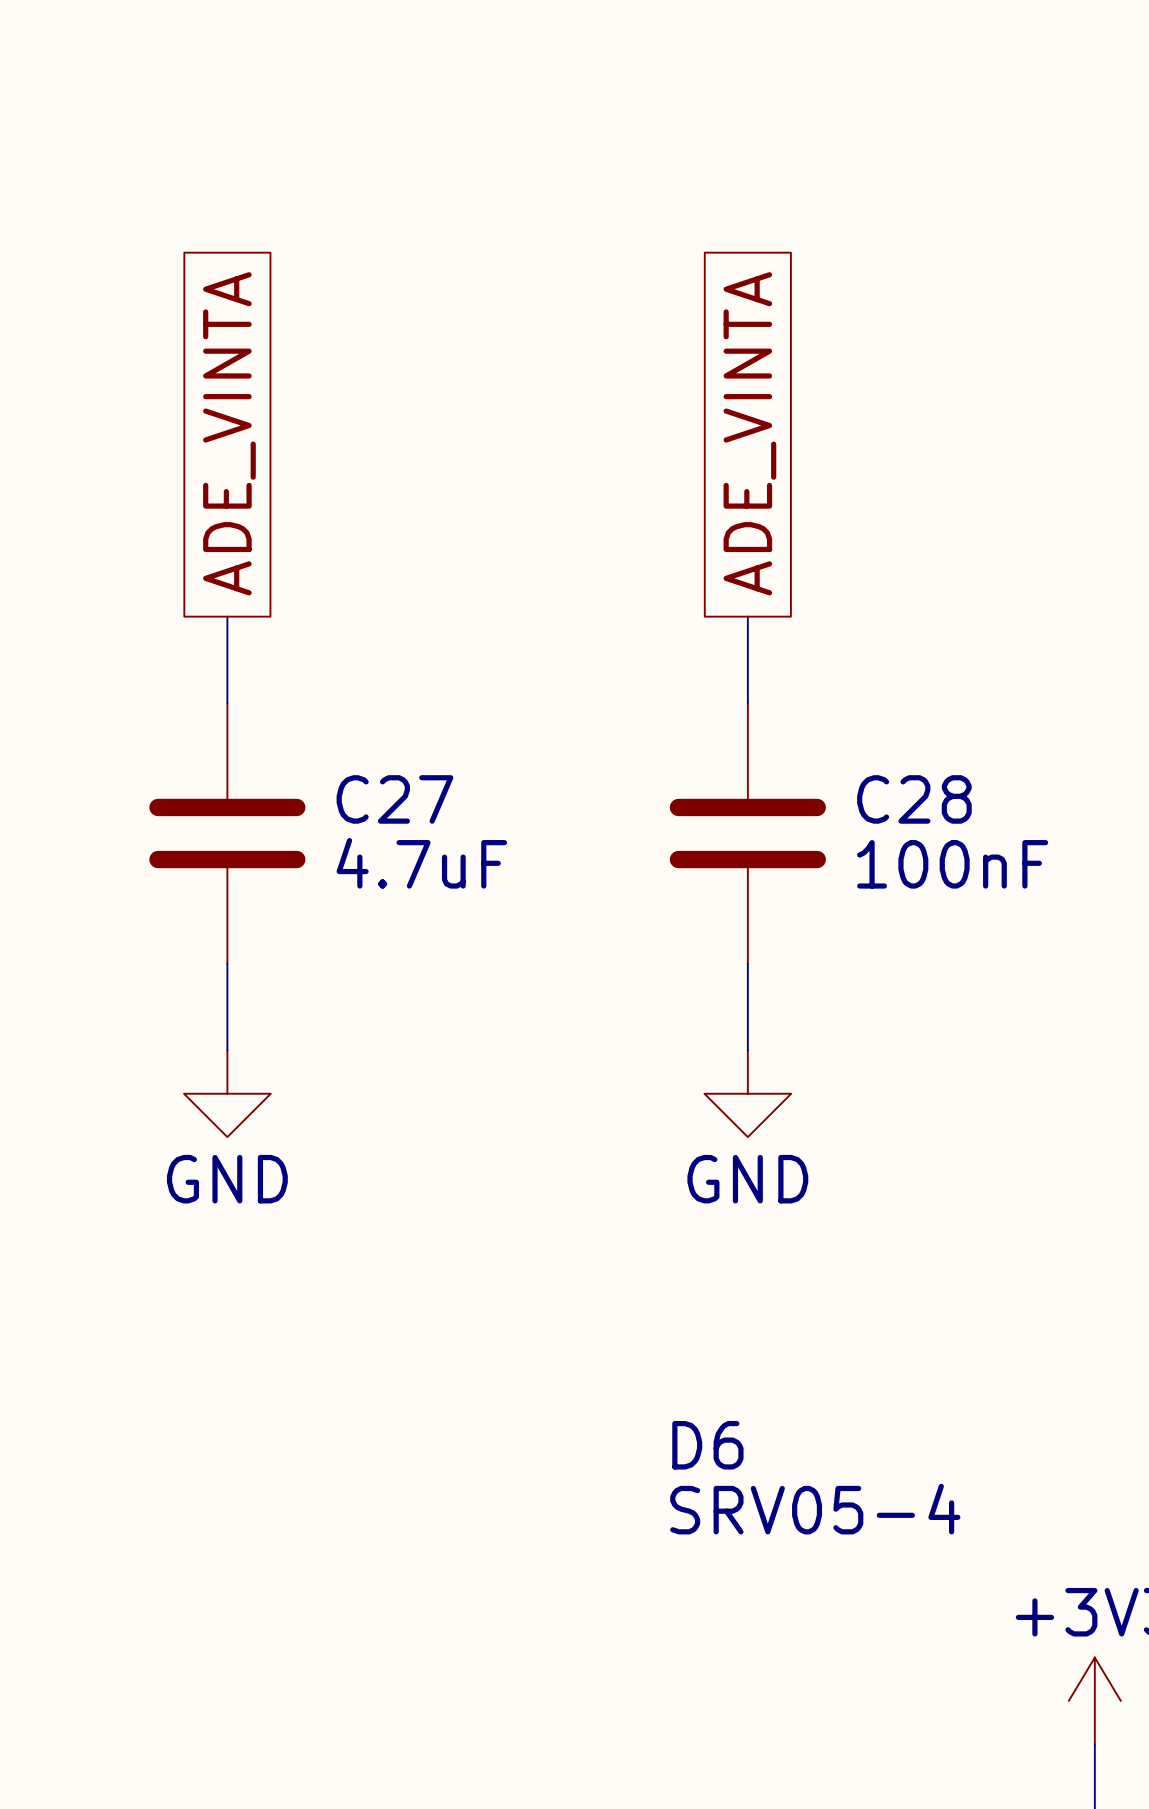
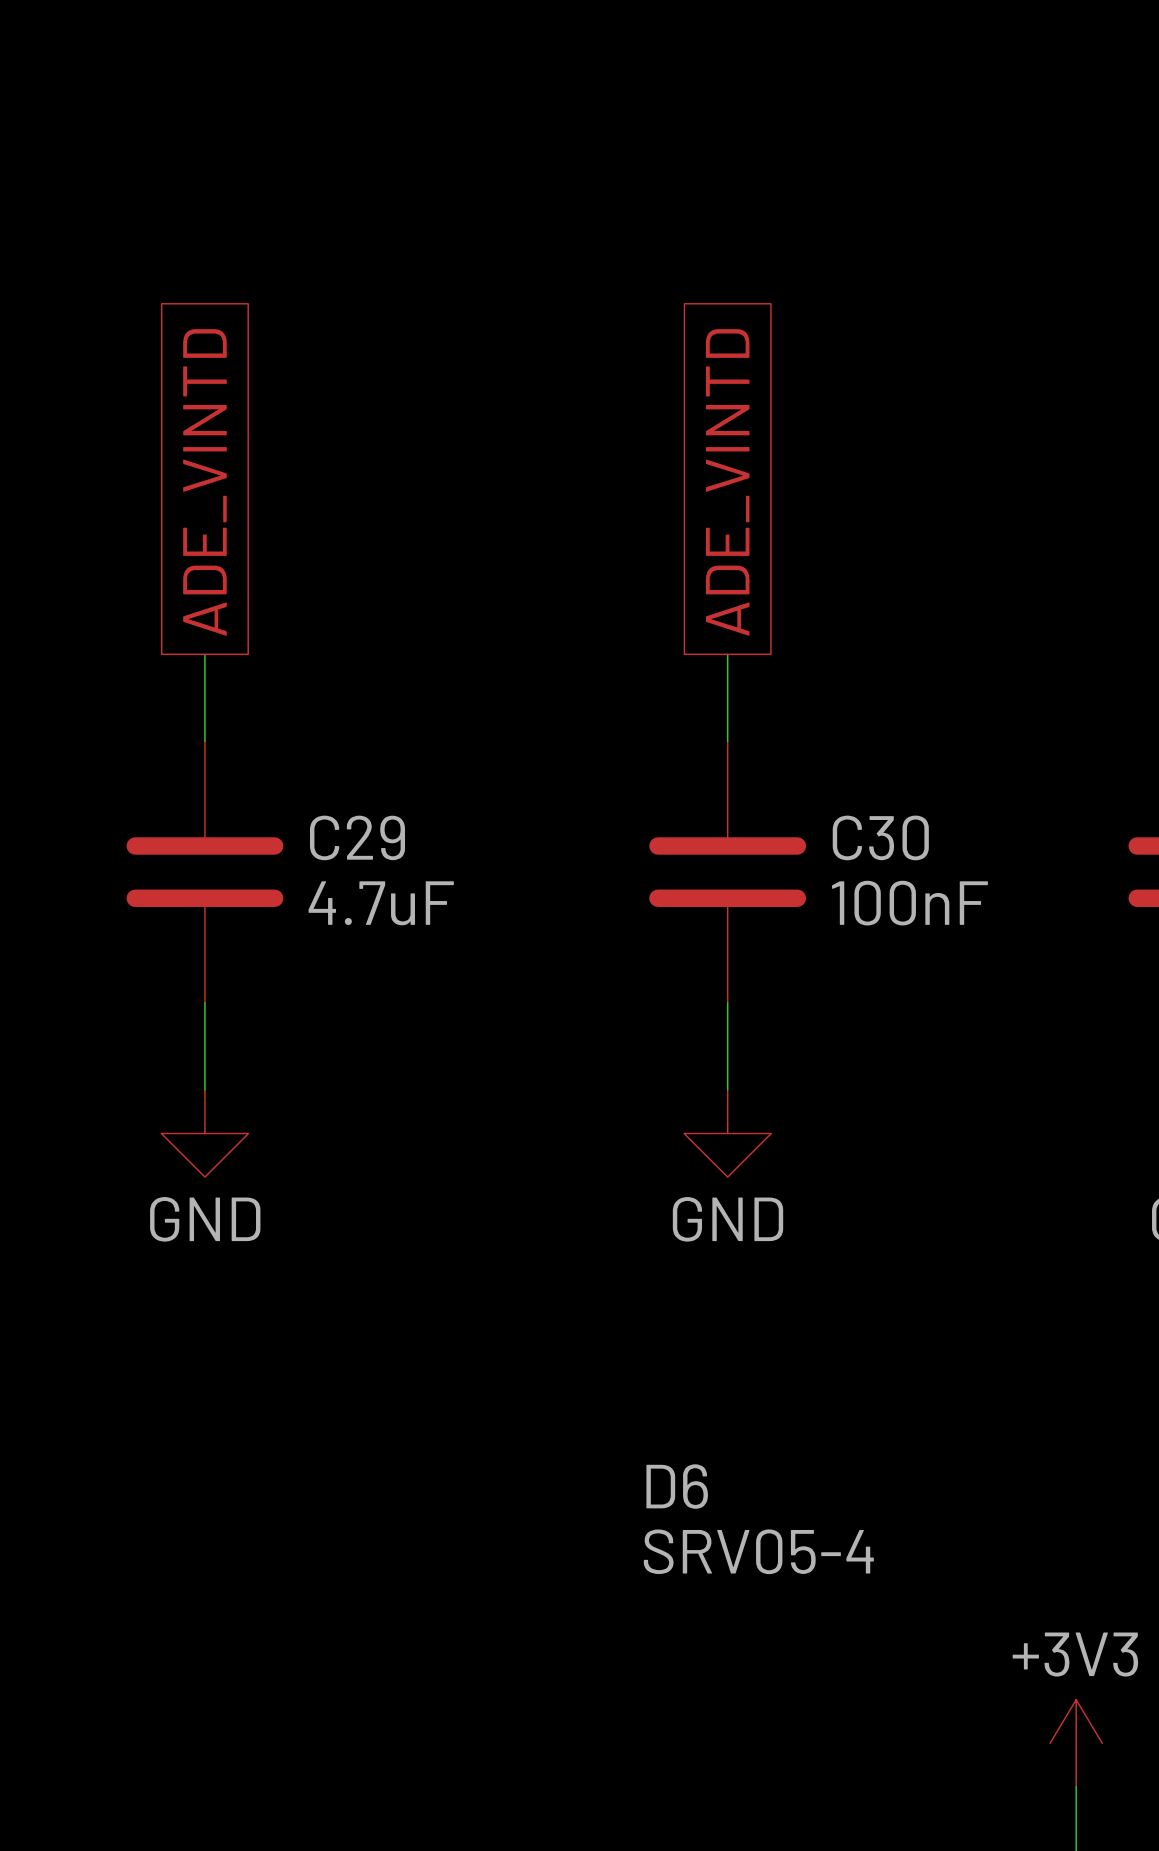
global label: ADE_VINTA (229, 433) -> ADE_VINTD (204, 482)
global label: ADE_VINTA (749, 433) -> ADE_VINTD (727, 482)
C27 name: C27 (394, 799) -> C29 (357, 837)
C28 name: C28 (914, 799) -> C30 (880, 837)

